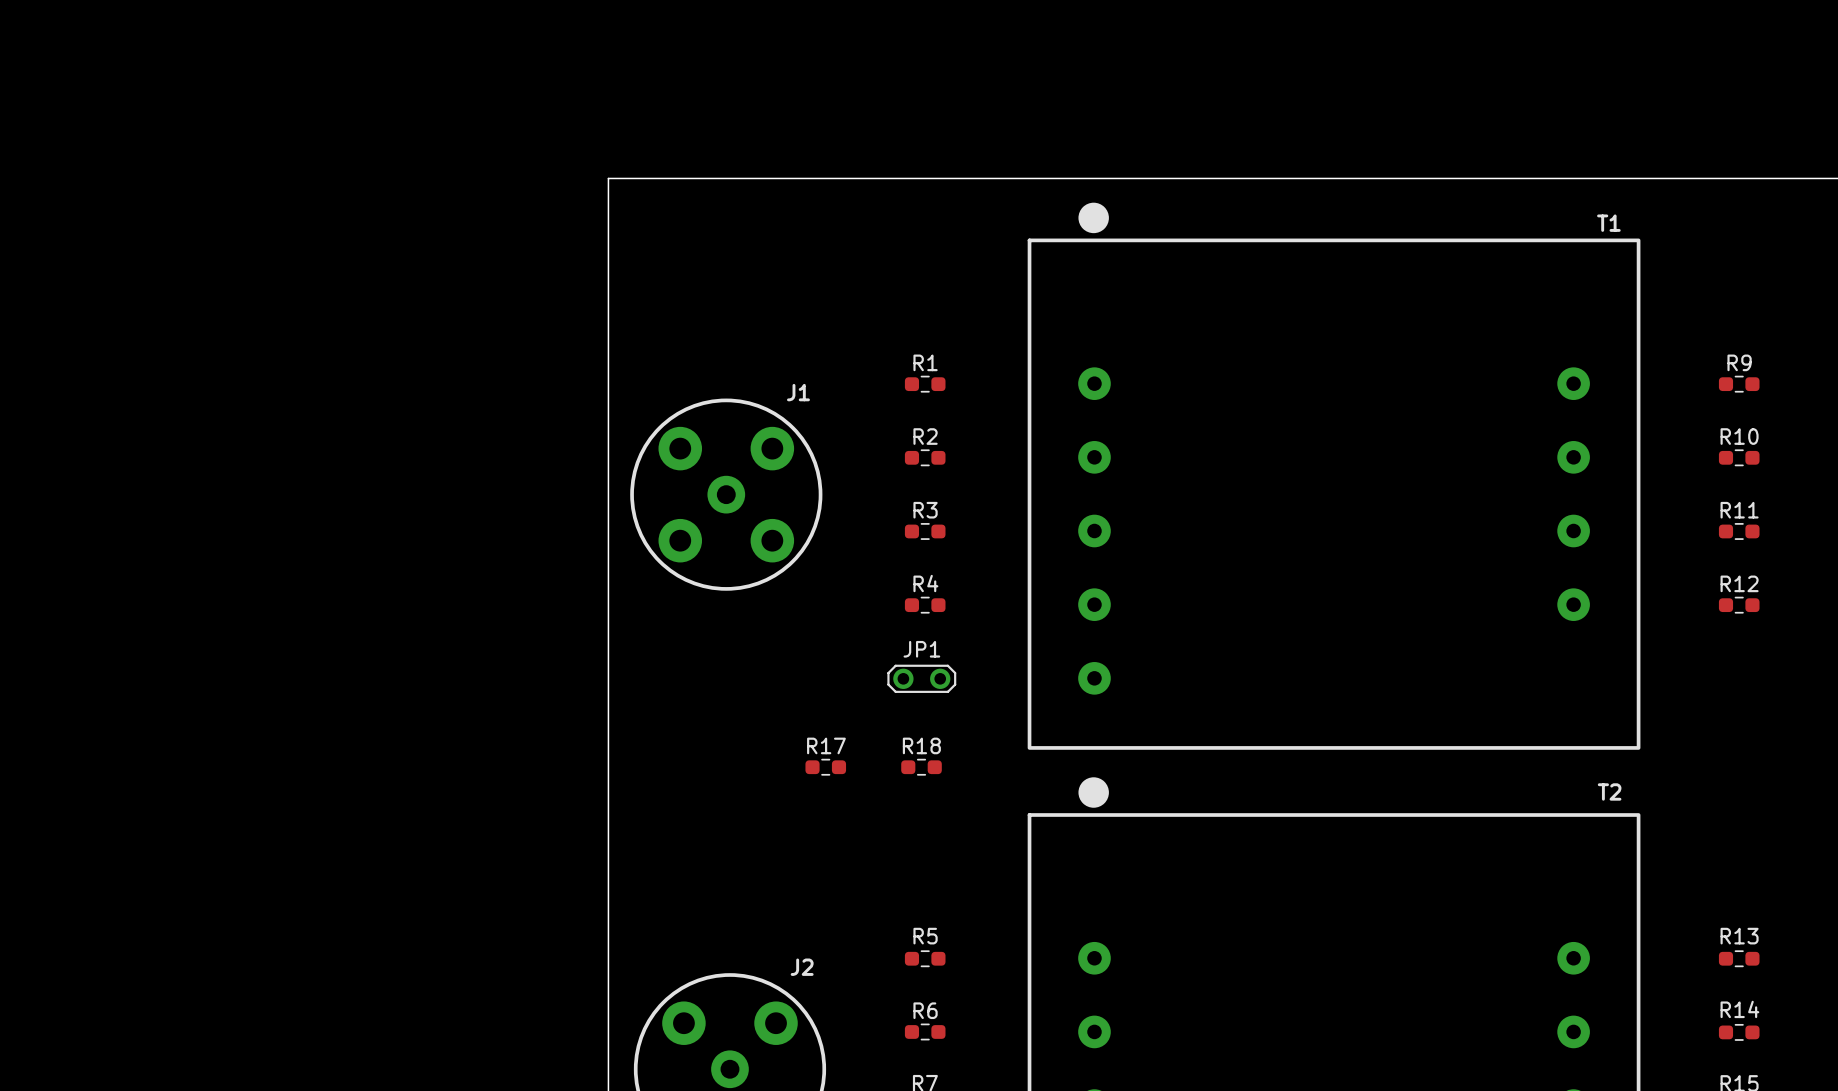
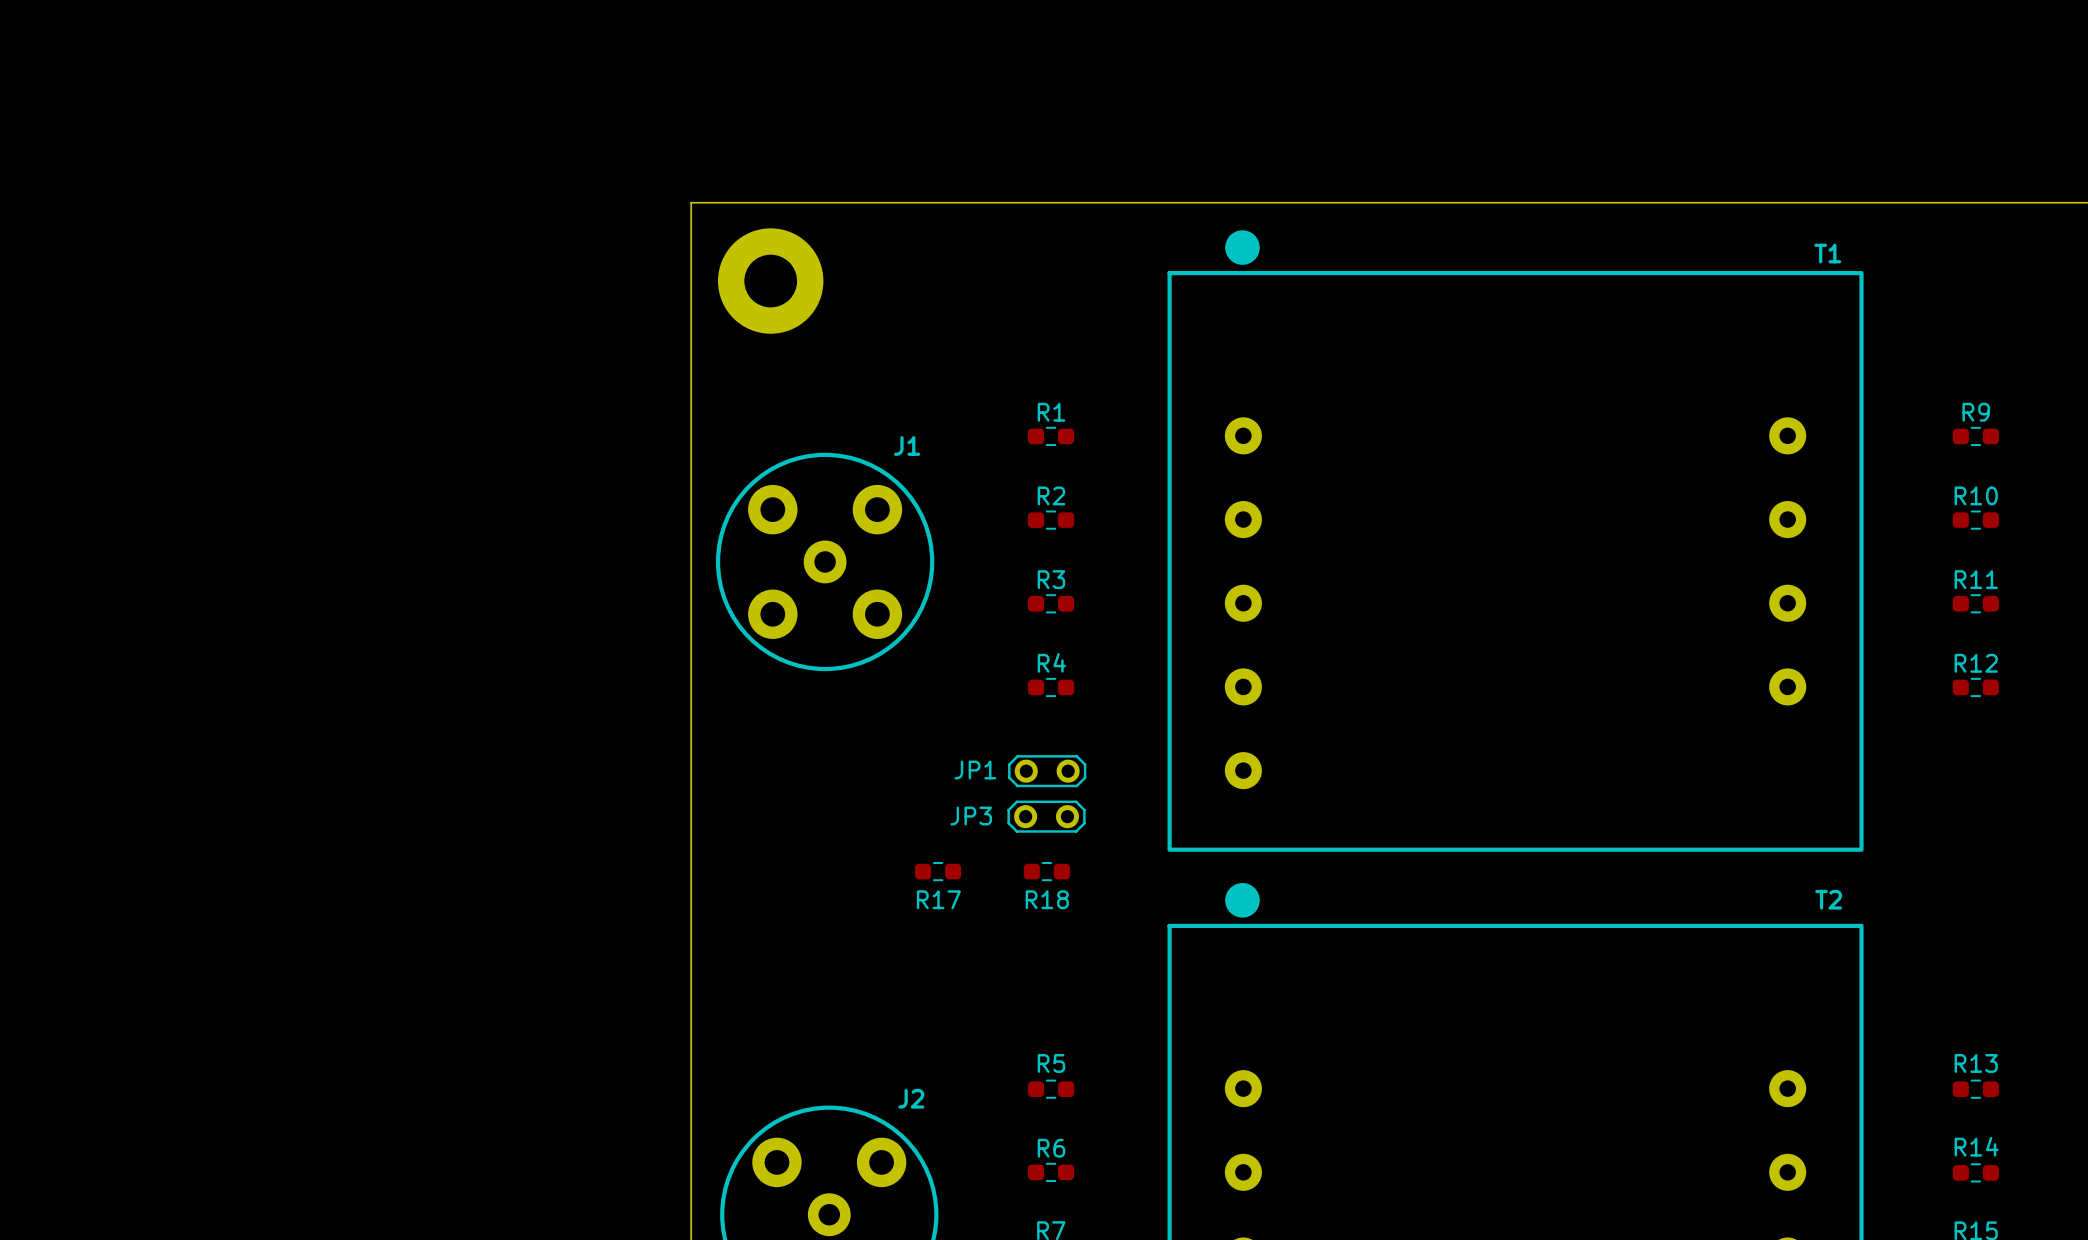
part: none -> (770, 281)
JP1 name position: JP1 (921, 649) -> JP1 (975, 770)
JP3: none -> (1046, 816)
R17 name position: R17 (826, 745) -> R17 (938, 899)
R18 name position: R18 (921, 745) -> R18 (1047, 899)

